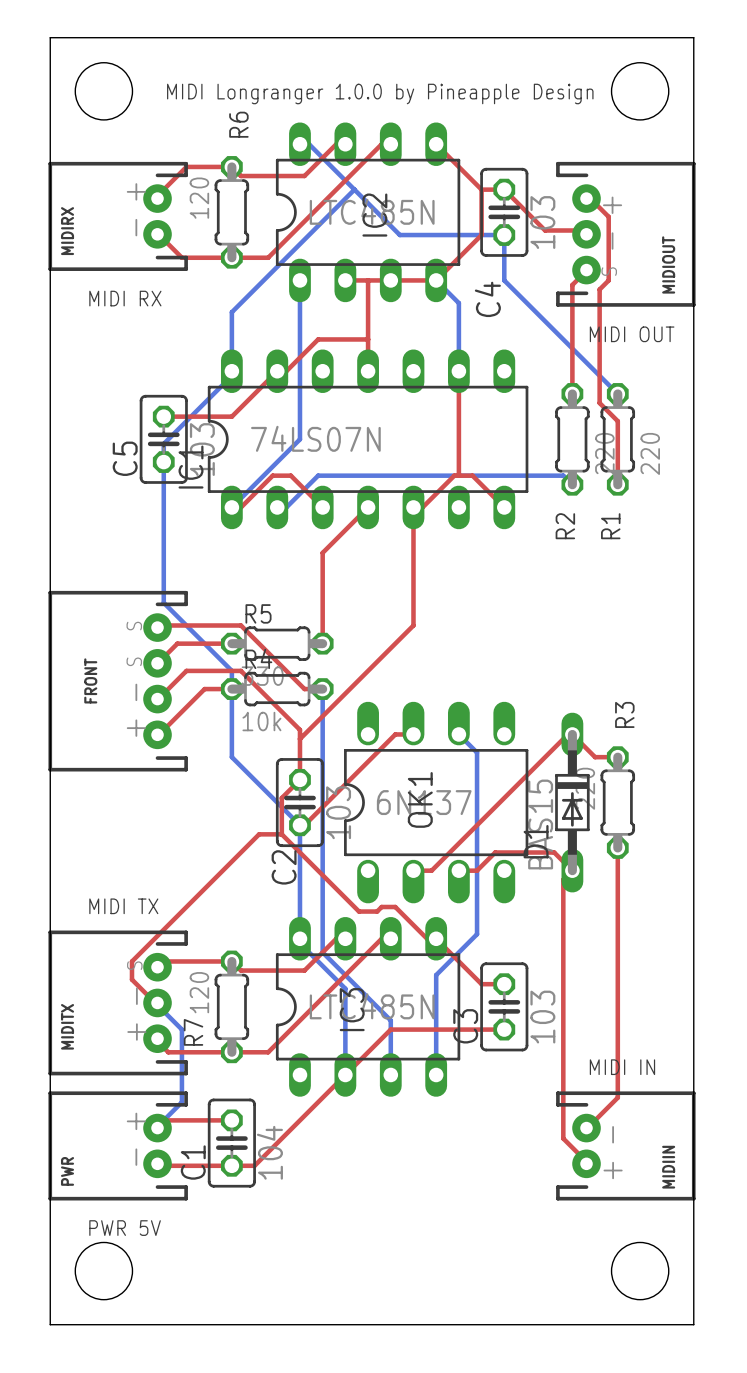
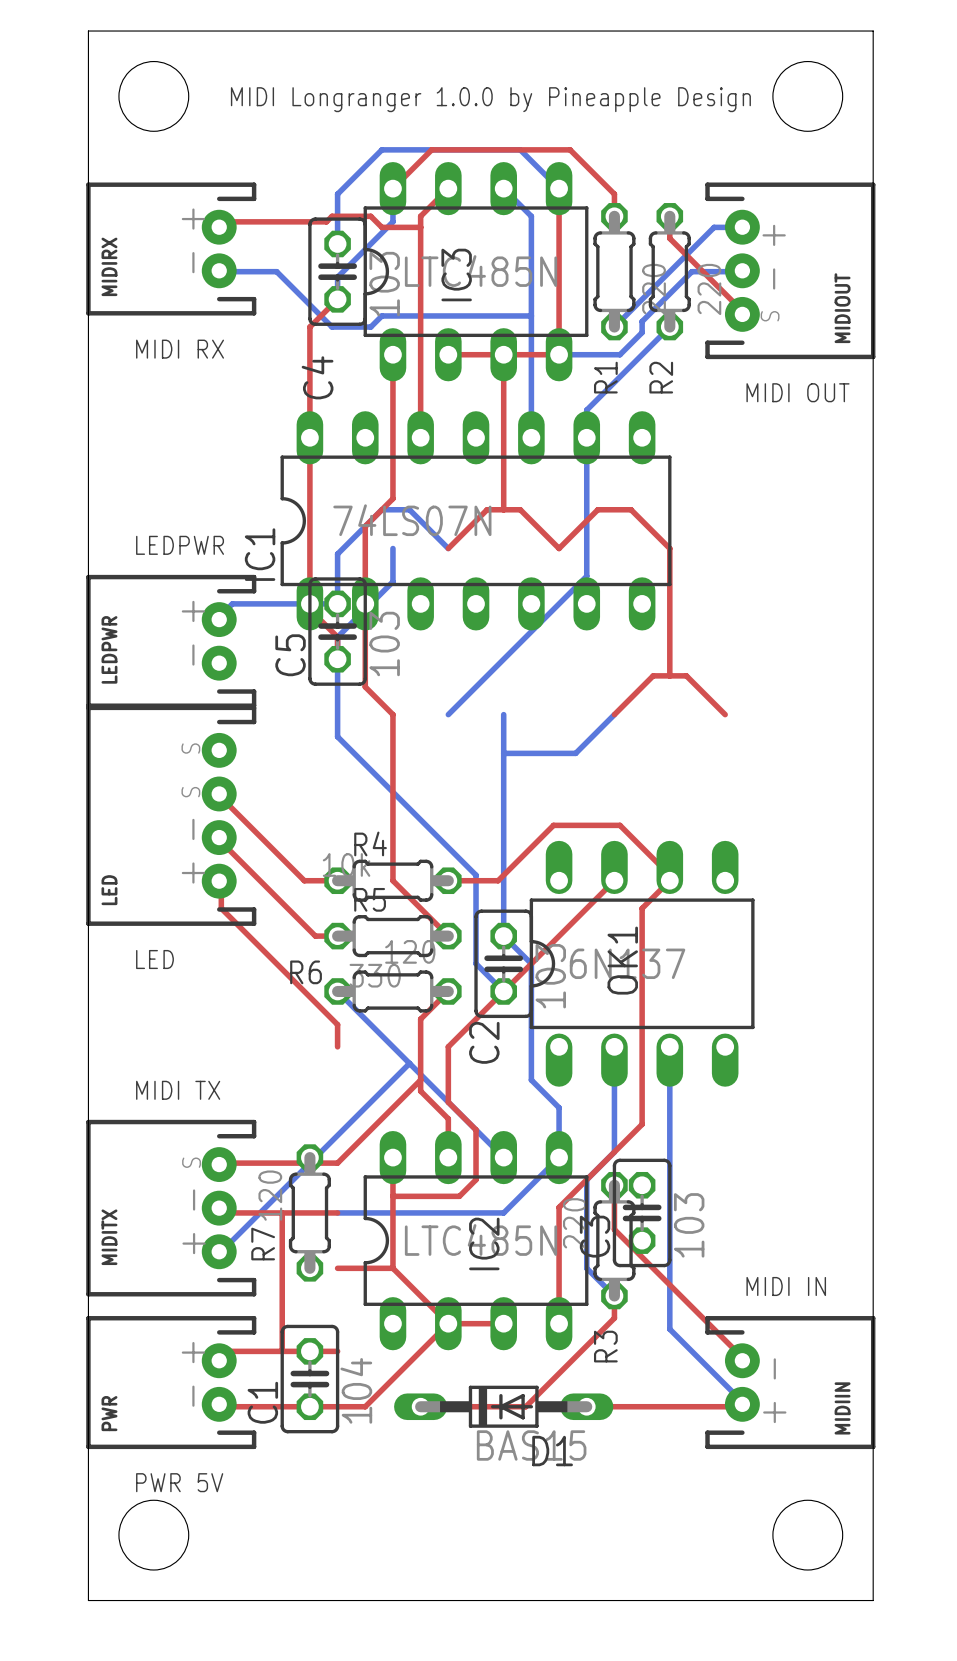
R6 name position: R6 (238, 124) -> R6 (306, 972)
bottom track: (299, 144) (309, 144) (399, 235) (504, 235) (504, 275) -> (742, 270) (691, 271) (642, 321)
top track: (345, 144) (336, 144) (304, 176) (240, 176) (231, 166) (186, 166) (159, 194) -> (420, 227) (381, 227) (370, 216) (332, 216) (326, 221) (221, 221)
top track: (390, 144) (381, 144) (268, 257) (181, 257) (157, 234) -> none
top track: (436, 144) (481, 189) -> none
bottom track: none -> (392, 188) (392, 221) (337, 277) (337, 299)
top track: none -> (448, 188) (420, 216) (420, 437)
bottom track: none -> (503, 188) (531, 216) (531, 437)
top track: none -> (559, 188) (559, 354) (448, 354)
bottom track: none -> (559, 188) (520, 149) (381, 149) (337, 194) (337, 243)
bottom track: (354, 189) (231, 312) (231, 375) (163, 443) (163, 602) (231, 670) (231, 757) (299, 825) (299, 943) (345, 988) (345, 1074) -> none
top track: (481, 189) (481, 235) (436, 280) (345, 280) -> (614, 216) (614, 194) (570, 149) (431, 149) (392, 188)
top track: (481, 189) (504, 189) (545, 230) (586, 230) (586, 234) -> none
top track: (586, 198) (590, 198) (608, 216) (608, 280) (599, 289) (599, 403) (617, 421) (617, 484) -> none
bottom track: none -> (742, 227) (714, 227) (614, 327)
R6 rotation: 0° (231, 212) -> 90° clockwise (392, 991)
R6 position: (231, 212) -> (392, 991)
IC2 position: (368, 212) -> (476, 1240)
C4 position: (504, 212) -> (337, 271)
bottom track: none -> (219, 270) (276, 271) (332, 327) (370, 327) (381, 315) (531, 315)
top track: none -> (337, 299) (309, 327) (309, 609) (337, 637) (337, 659)
top track: (586, 270) (572, 284) (572, 393) -> (742, 314) (741, 310) (669, 238) (669, 216)
bottom track: (299, 280) (299, 439) (231, 507) -> none
top track: (368, 280) (368, 371) -> none
bottom track: (436, 280) (458, 303) (458, 348) -> (669, 327) (586, 410)
bottom track: (504, 280) (617, 393) -> (642, 327) (642, 332) (619, 354) (559, 354)
top track: none -> (392, 354) (392, 498) (365, 526) (365, 686) (392, 714) (392, 875)
top track: none -> (503, 354) (503, 509)
top track: (368, 339) (318, 339) (286, 371) (277, 371) (231, 416) (163, 416) -> none
top track: (458, 371) (458, 475) -> none
bottom track: none -> (586, 437) (586, 576) (448, 714)
C5 position: (163, 439) -> (337, 631)
R2 position: (572, 439) -> (669, 271)
R1 position: (617, 439) -> (614, 271)
text: none -> LEDPWR (180, 545)
bottom track: none -> (392, 548) (392, 581) (337, 637) (337, 736) (476, 875) (476, 963) (503, 991)
top track: none -> (448, 548) (487, 509) (520, 509) (559, 548) (597, 509) (631, 509) (669, 548) (669, 675)
bottom track: none -> (448, 548) (409, 509) (381, 509) (337, 554) (337, 603) (232, 603) (219, 619)
bottom track: (572, 484) (563, 475) (318, 475) (286, 507) (277, 507) -> none
top track: (231, 507) (240, 507) (272, 475) (290, 475) (322, 507) -> none
top track: (368, 507) (322, 552) (322, 643) -> none
top track: (504, 507) (472, 475) (454, 475) (422, 507) (413, 507) (413, 625) (299, 739) -> none
LEDPWR: none -> (171, 641)
bottom track: none -> (503, 714) (503, 936) (531, 963) (531, 1080) (559, 1107) (559, 1157) (503, 1212) (337, 1212)
top track: none -> (614, 714) (653, 675) (686, 675) (725, 714)
bottom track: none -> (614, 714) (575, 753) (503, 753)
top track: (157, 627) (159, 625) (240, 625) (304, 689) (322, 689) -> none
top track: (231, 643) (177, 643) (157, 663) -> (337, 880) (304, 880) (219, 793)
R5 position: (277, 643) -> (392, 936)
FRONT name: FRONT (90, 680) -> LED (109, 890)
top track: (231, 689) (204, 689) (157, 734) -> (337, 1046) (337, 1024) (221, 908) (221, 886) (219, 881)
R4 position: (277, 689) -> (392, 880)
bottom track: (322, 689) (322, 952) (390, 1020) (390, 1074) -> none
top track: (157, 699) (186, 670) (240, 670) (299, 729) -> (219, 837) (221, 841) (315, 936) (337, 936)
R3 name position: R3 (624, 714) -> R3 (605, 1346)
top track: (299, 734) (299, 779) (281, 798) (281, 834) -> (392, 880) (448, 936)
top track: none -> (448, 880) (498, 880) (553, 825) (619, 825) (669, 875) (669, 880) (642, 908) (642, 1124) (559, 1207) (559, 1323)
top track: (413, 734) (395, 734) (304, 825) (299, 825) -> none
bottom track: (458, 734) (477, 752) (477, 934) (436, 975) (436, 1074) -> none
top track: none -> (614, 880) (448, 1046) (448, 1102) (476, 1129) (476, 1179) (459, 1196) (392, 1196)
top track: (617, 757) (595, 757) (572, 734) (567, 734) (431, 870) (413, 870) -> none
text: none -> LED (154, 959)
C2 position: (299, 802) -> (503, 963)
OK1 position: (436, 802) -> (642, 963)
D1 rotation: 0° (572, 802) -> 90° counterclockwise (503, 1406)
D1 position: (572, 802) -> (503, 1406)
R3 position: (617, 802) -> (614, 1240)
bottom track: none -> (337, 991) (503, 1157)
top track: none -> (448, 991) (420, 1019) (420, 1091) (448, 1118) (448, 1157)
top track: (281, 834) (259, 834) (131, 961) (131, 979) (157, 1002) -> (337, 1212) (221, 1212) (219, 1208)
top track: (281, 834) (359, 911) (377, 911) (381, 906) (395, 906) (427, 938) (436, 938) (481, 984) (504, 984) -> none
top track: (617, 847) (617, 1097) (586, 1128) -> (614, 1185) (614, 1229) (741, 1356) (742, 1360)
top track: (458, 870) (477, 870) (495, 852) (554, 852) (572, 870) (563, 879) (563, 1138) (586, 1163) -> (586, 1406) (741, 1406) (742, 1404)
bottom track: none -> (614, 1046) (614, 1152) (586, 1179) (586, 1268) (614, 1296)
bottom track: none -> (669, 1046) (669, 1329) (741, 1401) (742, 1404)
bottom track: none -> (409, 1063) (219, 1251)
top track: (345, 938) (336, 938) (304, 970) (240, 970) (231, 961) (163, 961) (159, 966) -> (420, 1080) (337, 1163) (221, 1163)
top track: (390, 938) (381, 938) (268, 1052) -> (392, 1268) (354, 1268)
top track: none -> (392, 1157) (392, 1268)
bottom track: (157, 1002) (181, 1029) (181, 1102) (157, 1128) -> none
top track: none -> (282, 1212) (282, 1351)
IC3 position: (368, 1006) -> (476, 271)
top track: (504, 1029) (390, 1029) (254, 1165) -> (448, 1323) (365, 1406) (337, 1406)
top track: (157, 1038) (168, 1052) (254, 1052) -> none
top track: none -> (392, 1268) (448, 1323)
top track: none -> (614, 1296) (614, 1318) (525, 1406) (420, 1406)
top track: none -> (448, 1323) (503, 1323)
top track: none -> (309, 1351) (337, 1351)

